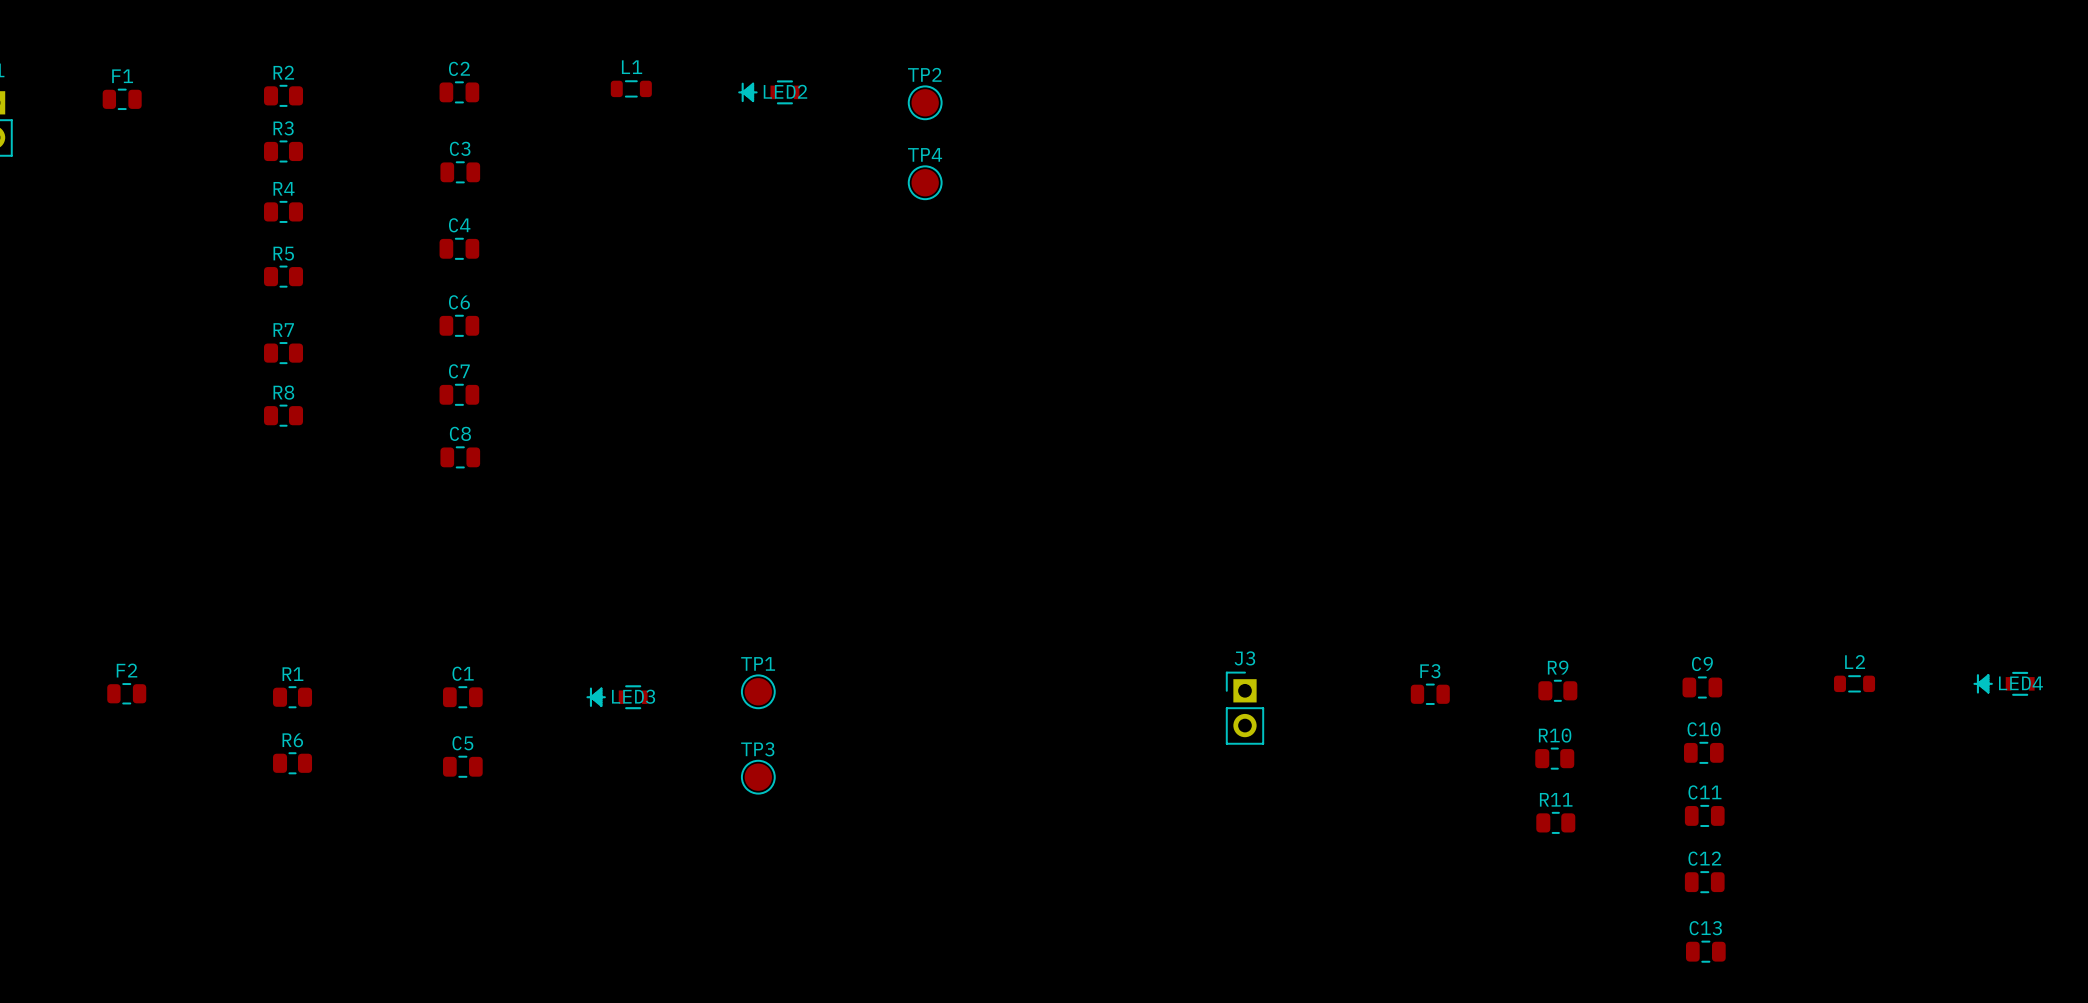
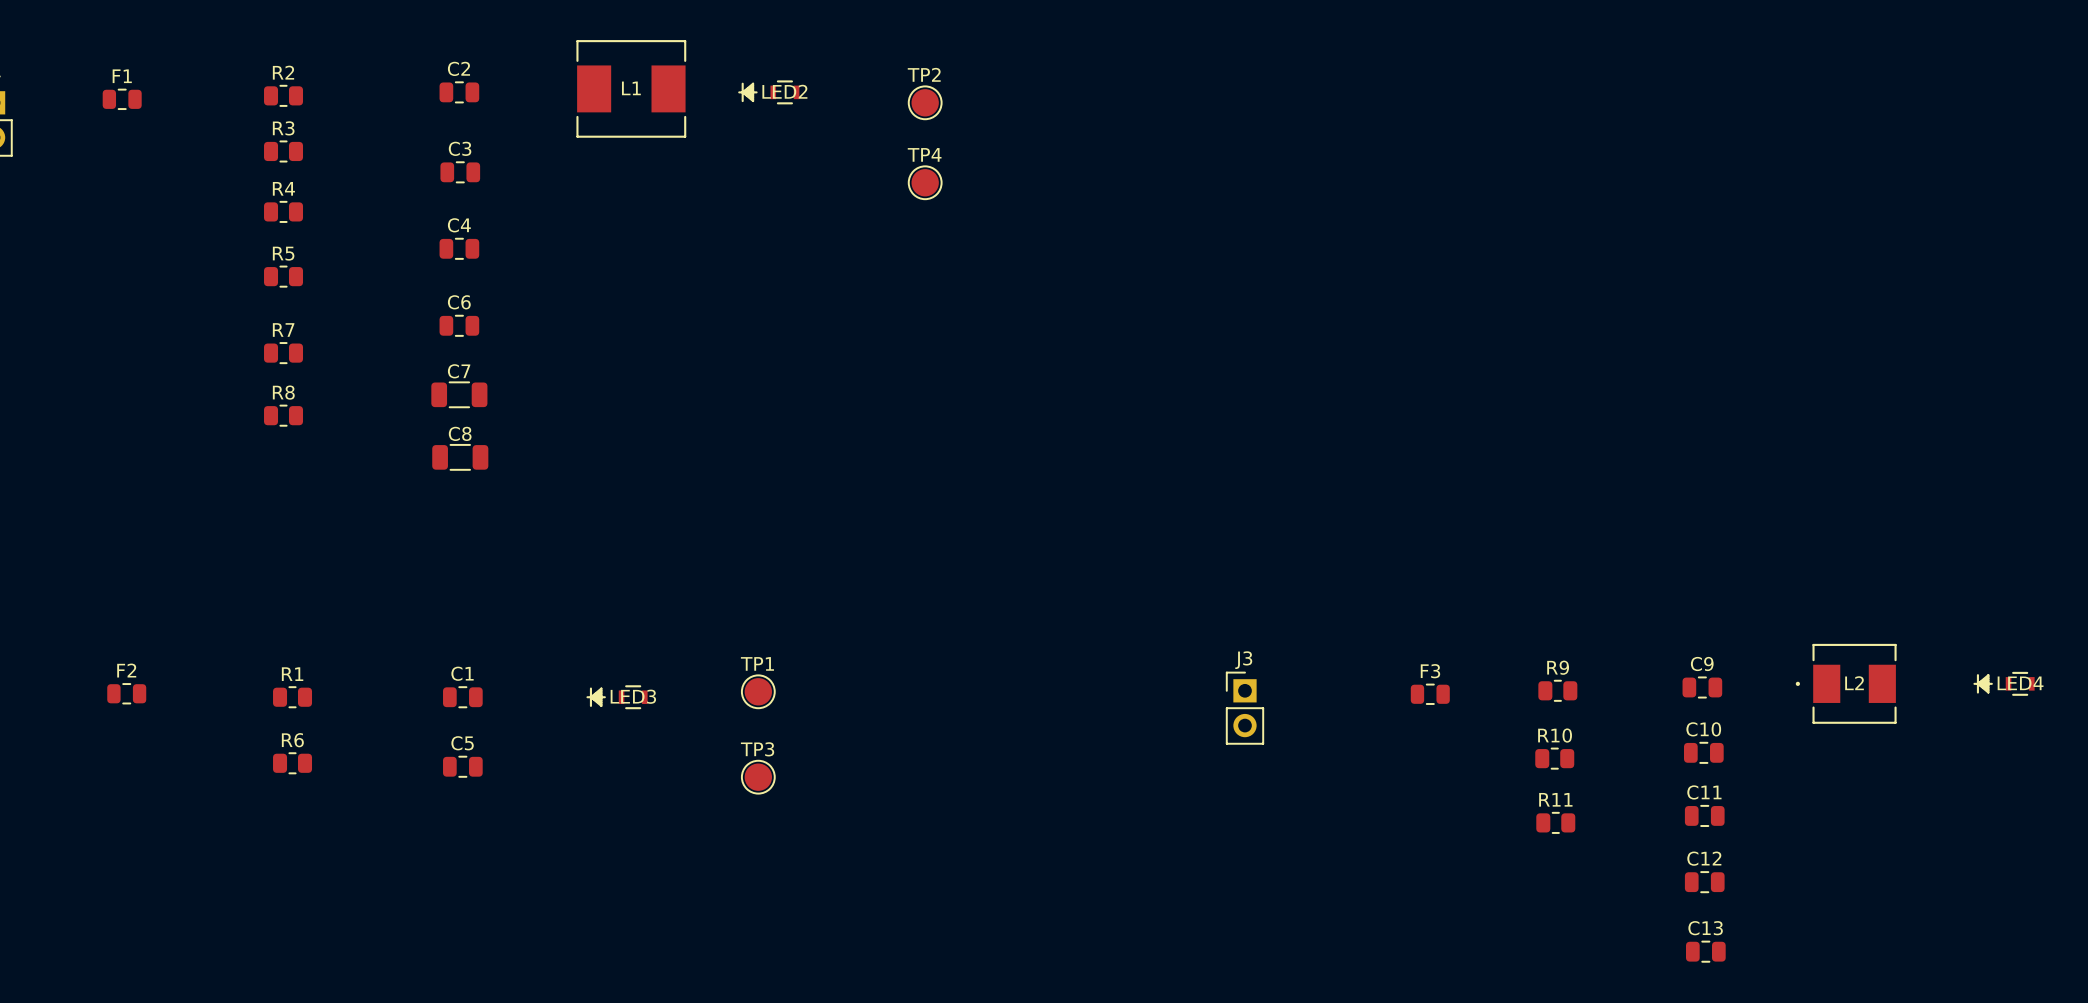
L1 footprint: [610, 80, 652, 98] -> [576, 40, 687, 138]
C7 footprint: [439, 383, 480, 406] -> [431, 381, 488, 409]
C8 footprint: [440, 446, 481, 469] -> [432, 444, 489, 471]
L2 footprint: [1834, 675, 1876, 693] -> [1795, 643, 1897, 724]

